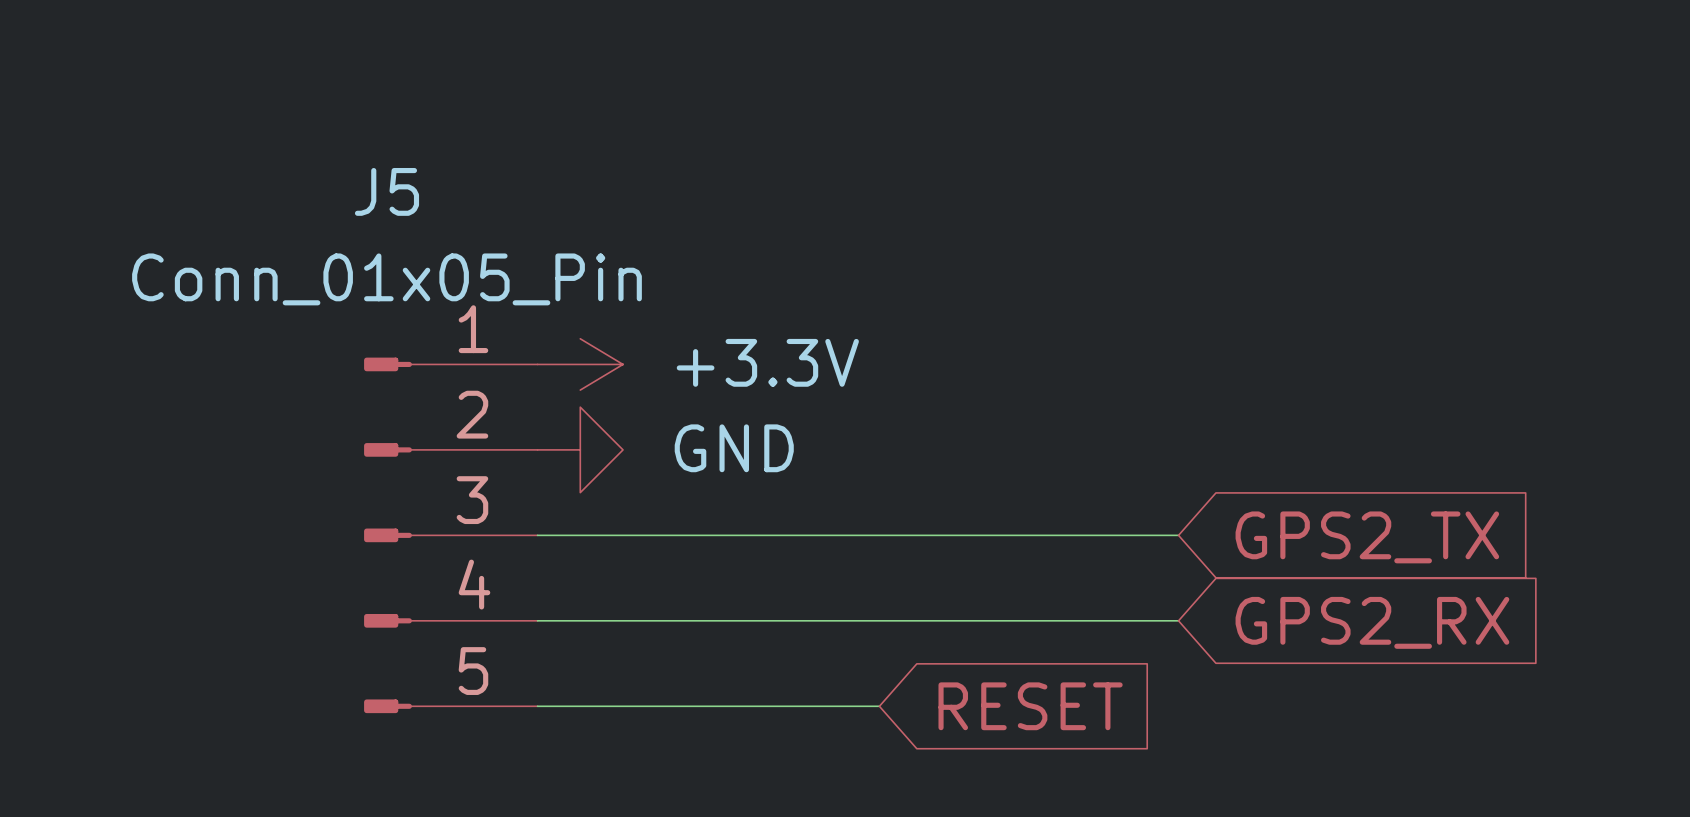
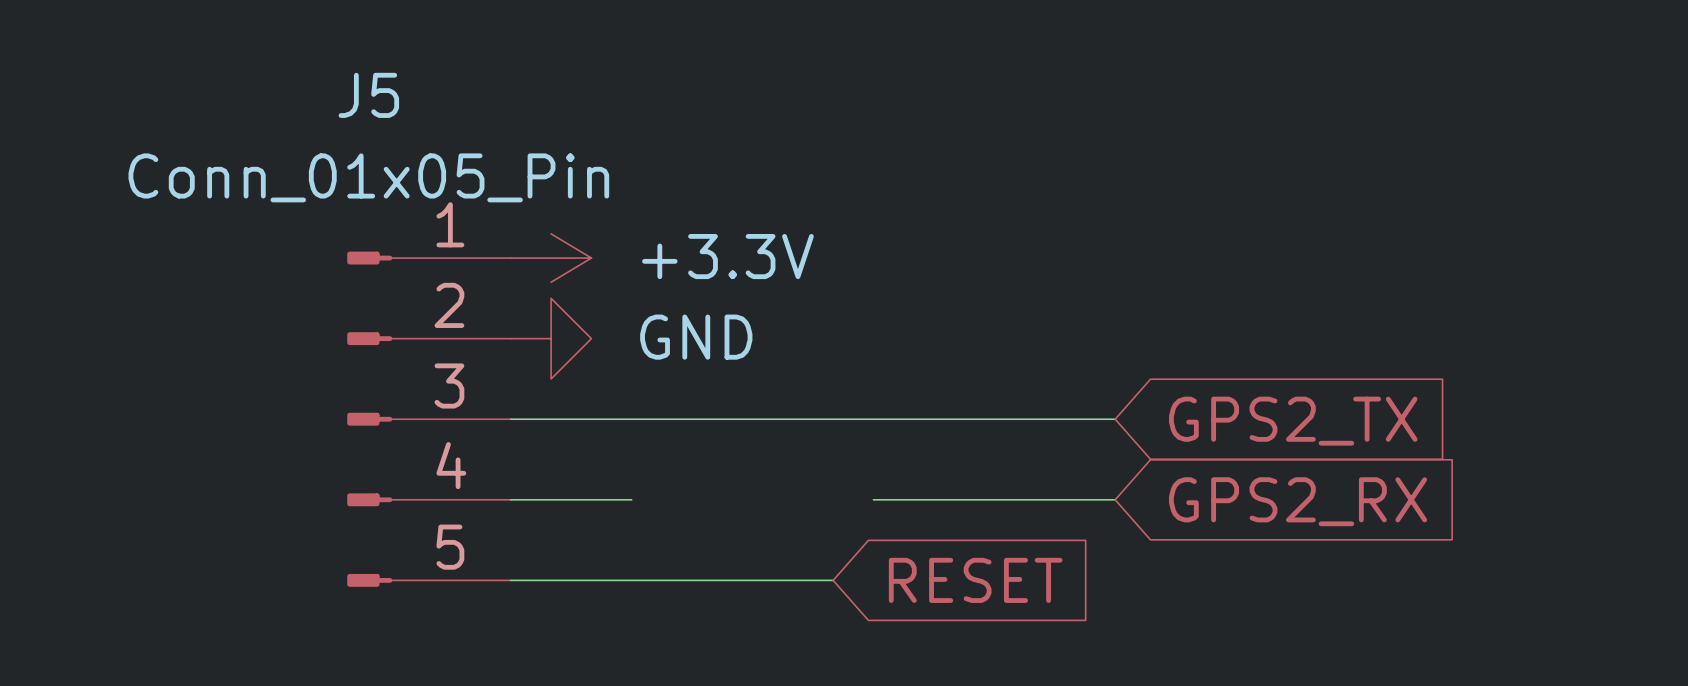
wire: (665, 620) (922, 620) -> none

